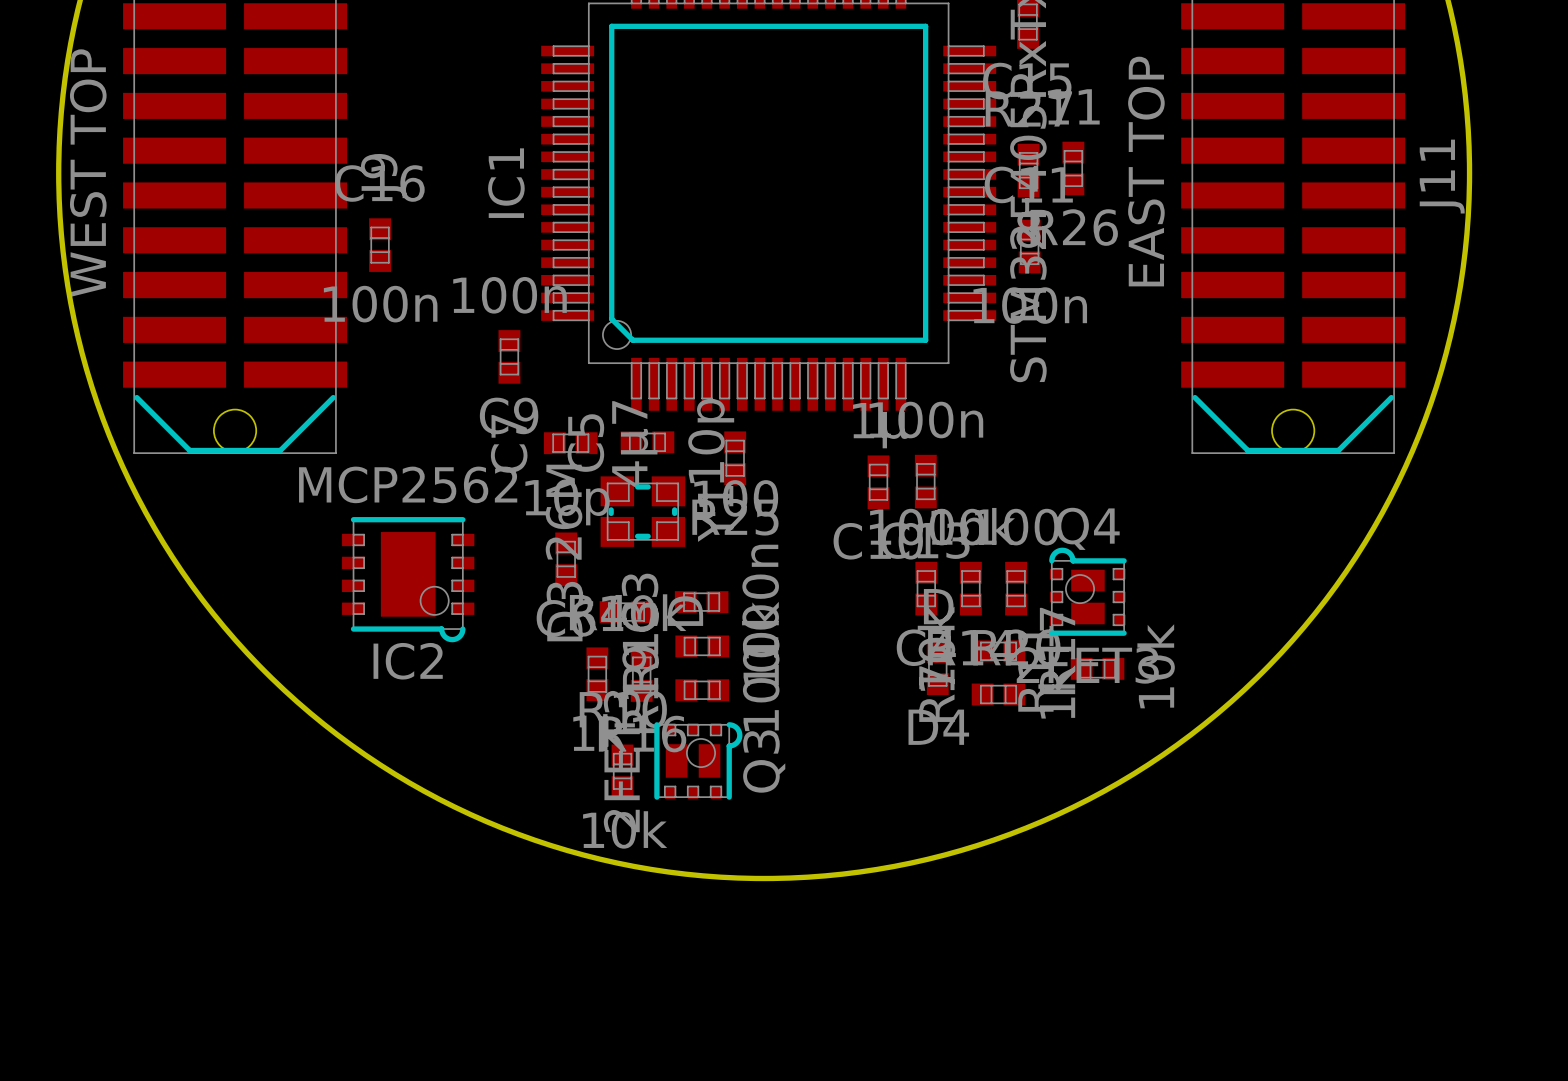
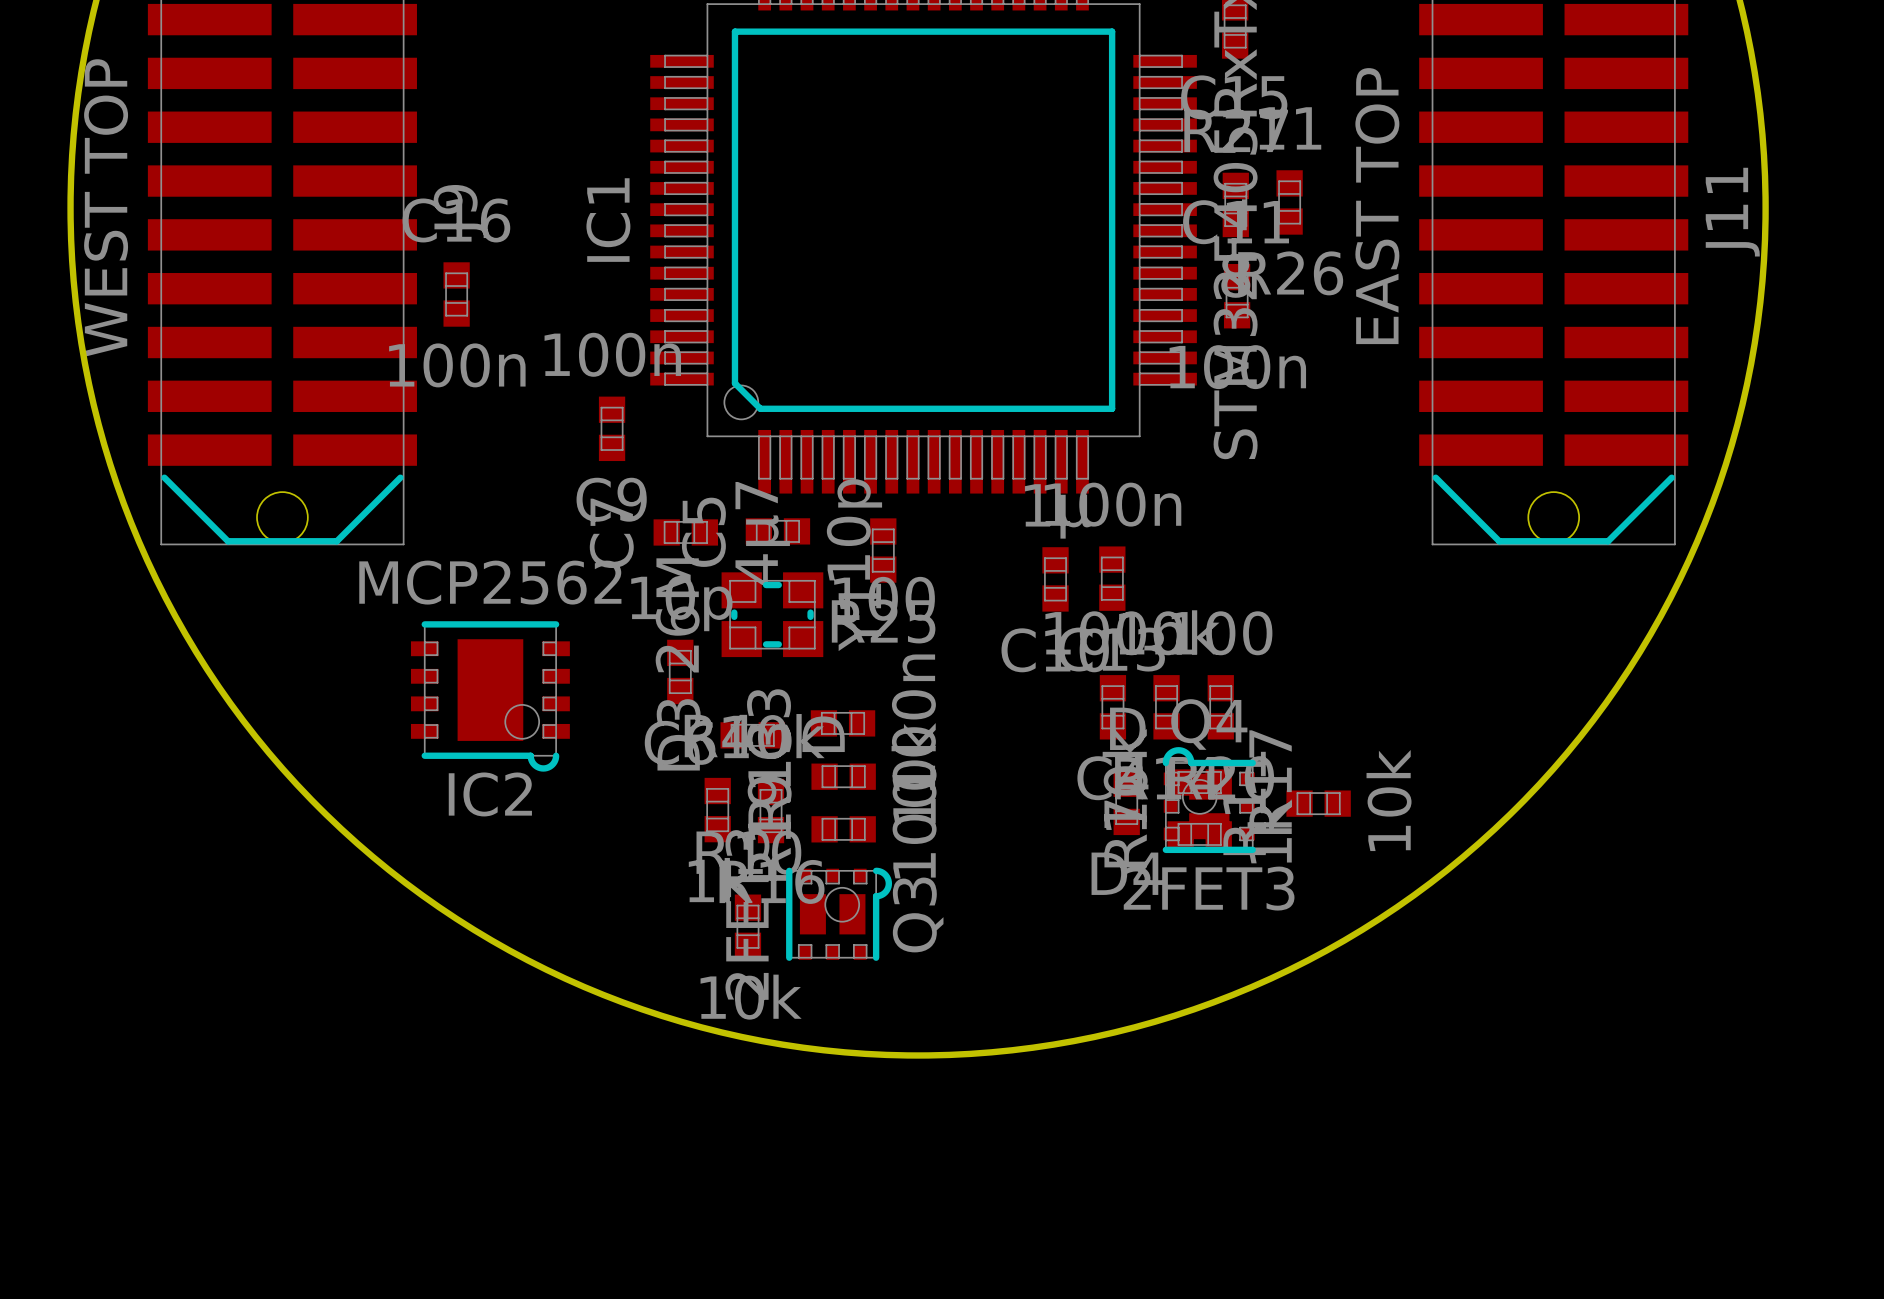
Q4 position: (1087, 591) -> (1209, 800)

